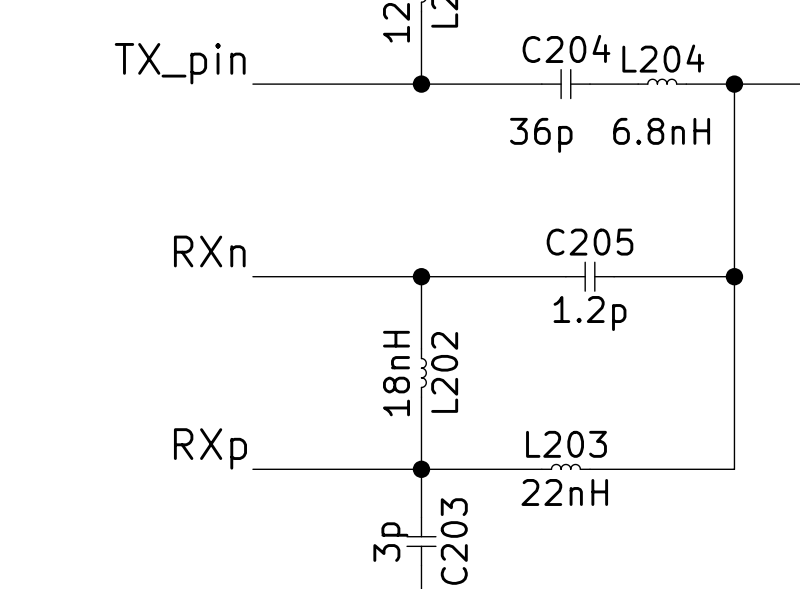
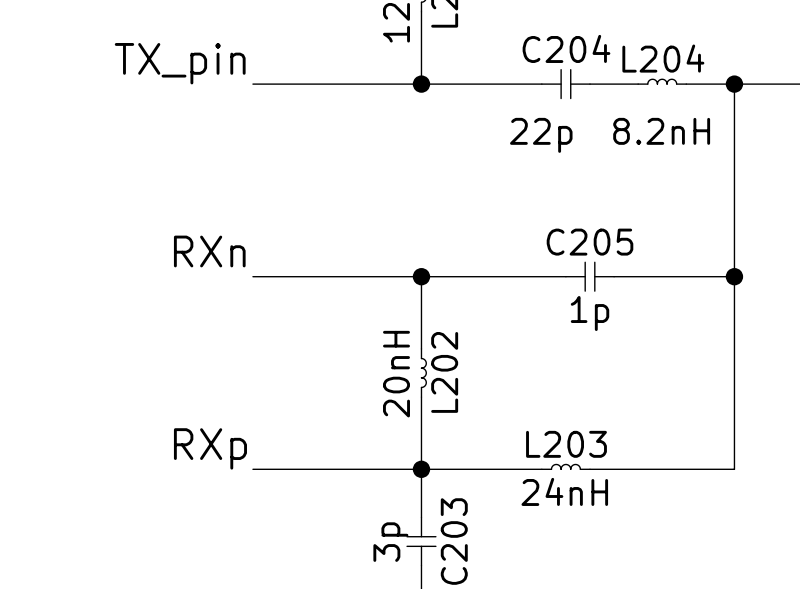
L204 value: 6.8nH (661, 131) -> 8.2nH (661, 131)
C204 value: 36p (541, 135) -> 22p (541, 135)
C205 value: 1.2p (590, 313) -> 1p (590, 313)
L202 value: 18nH (396, 373) -> 20nH (396, 374)
L203 value: 22nH (564, 492) -> 24nH (564, 491)

